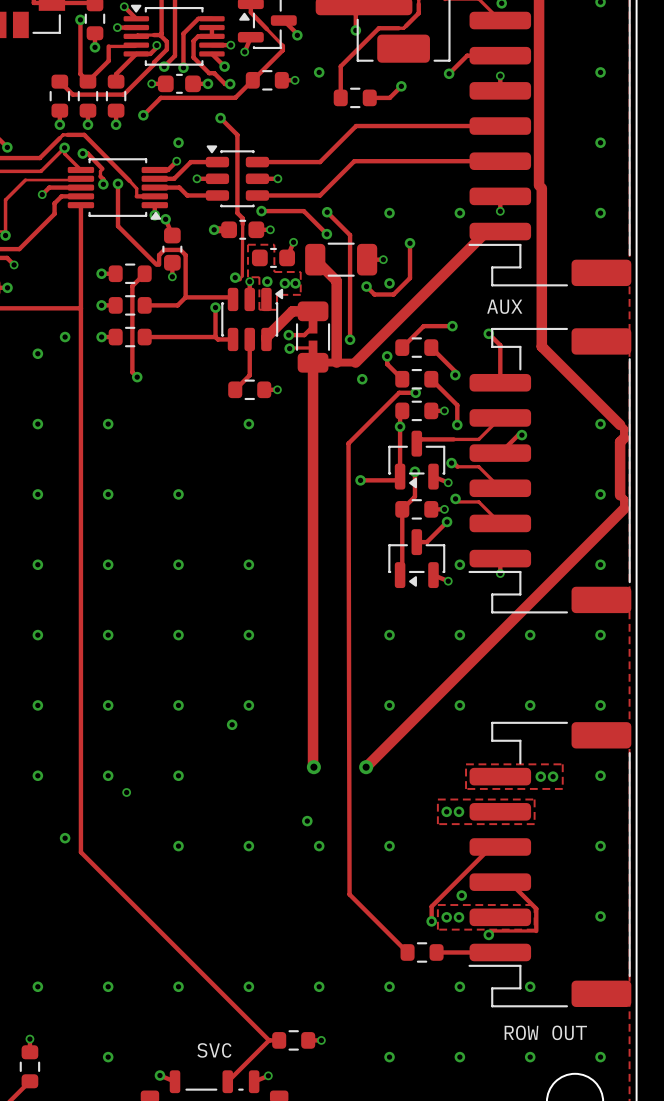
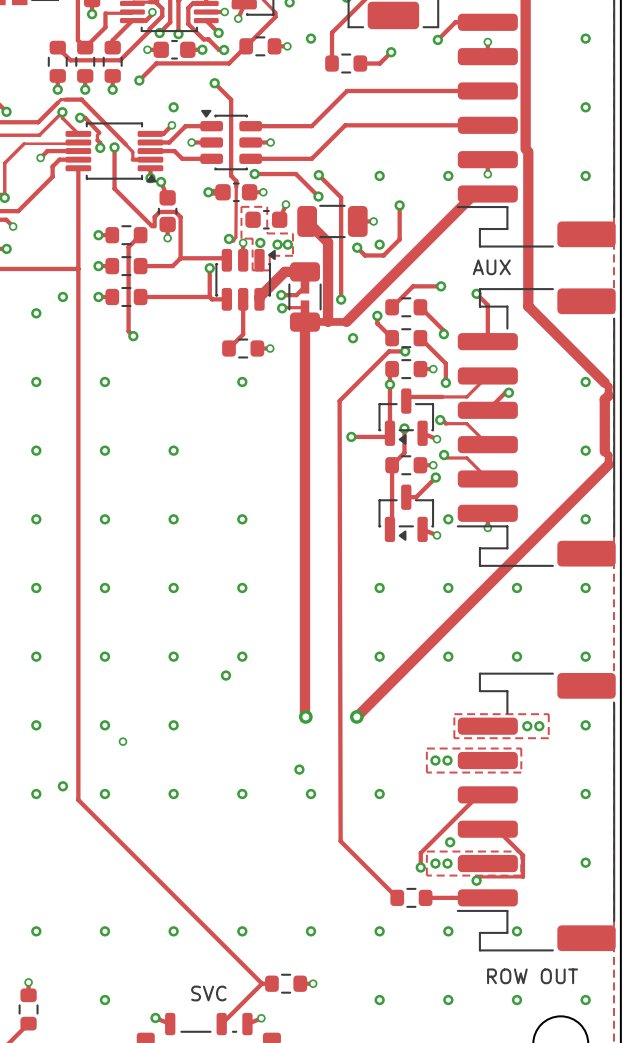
via: none -> (36, 794)
via: none -> (104, 794)

